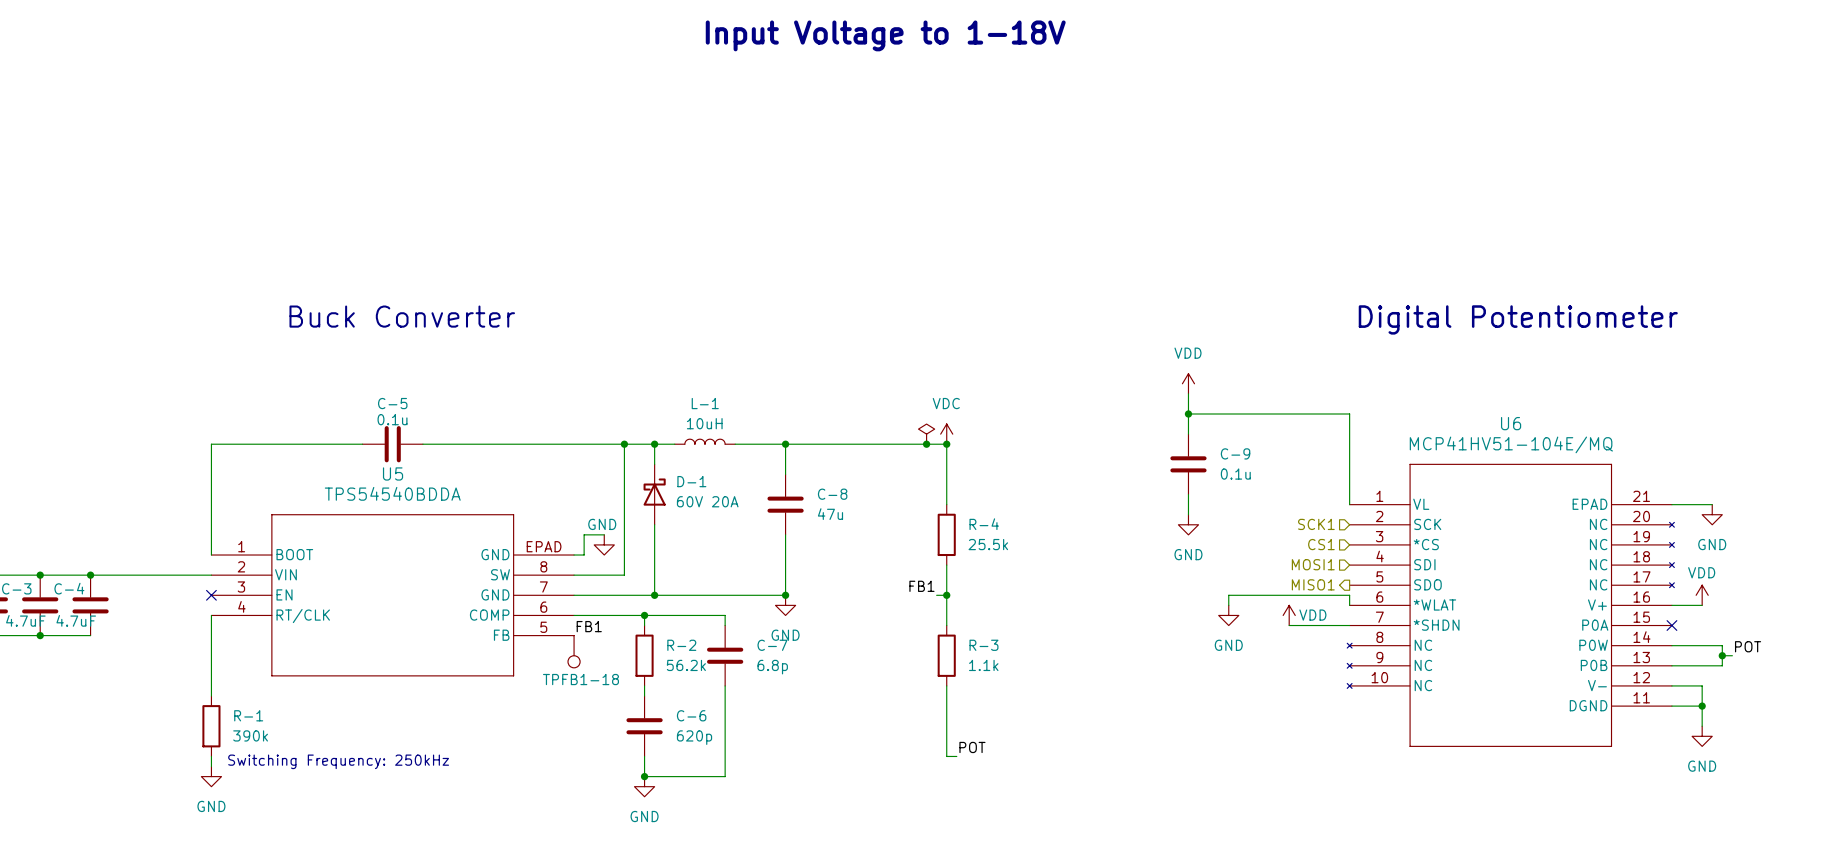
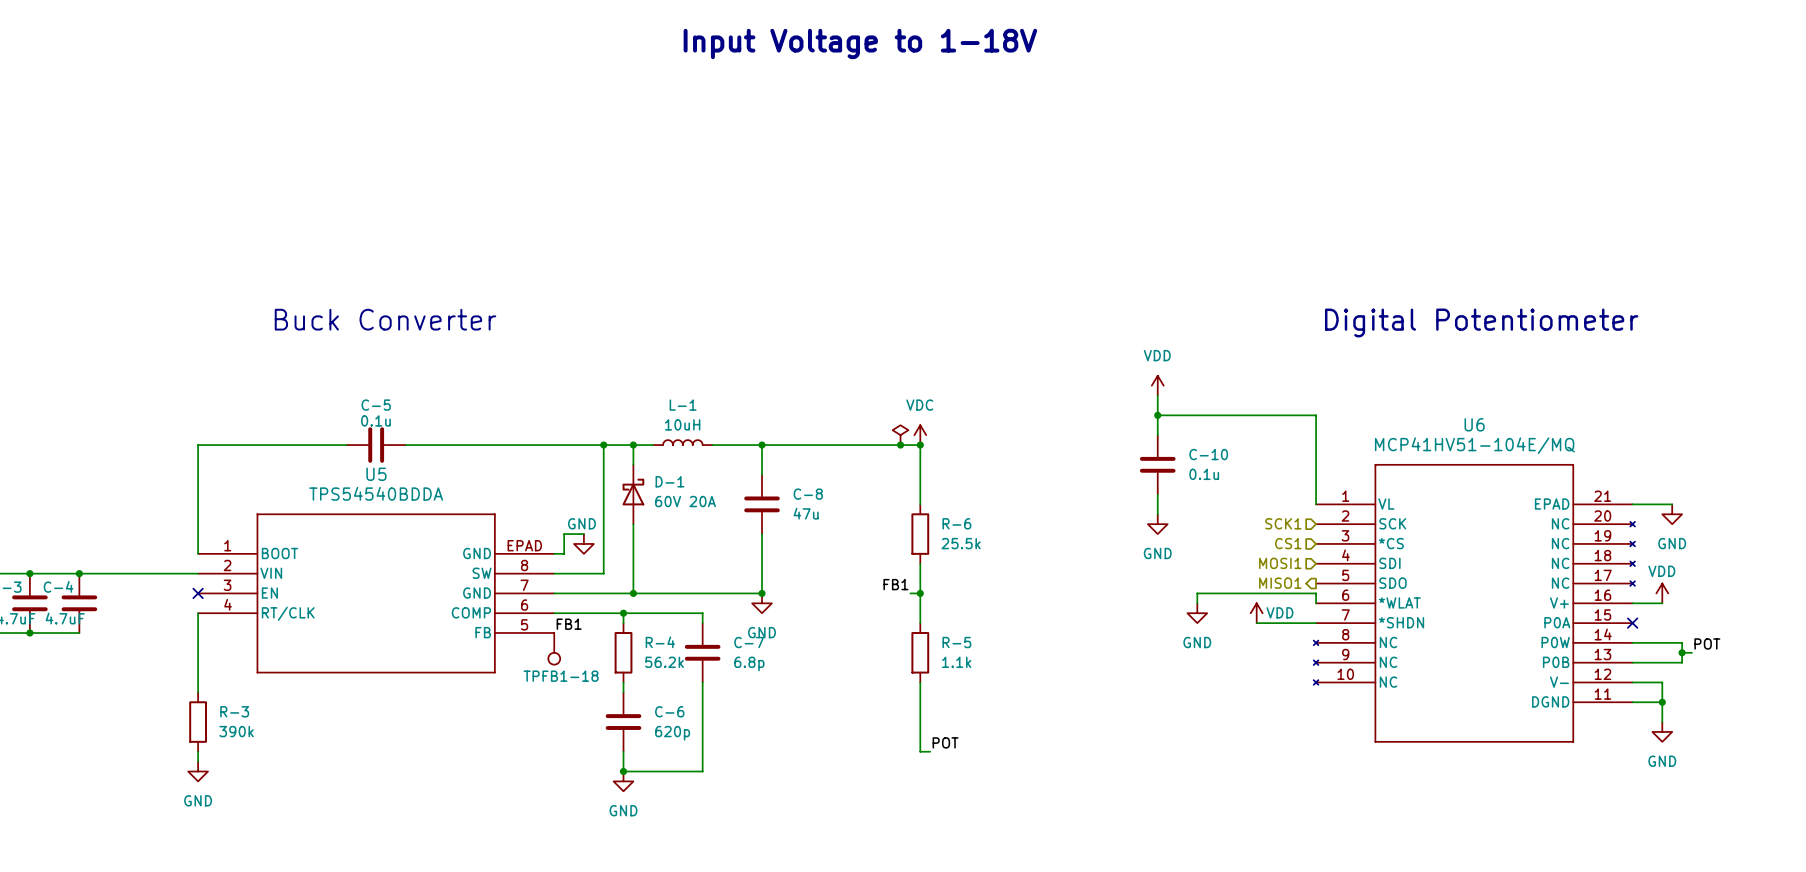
C-9 name: C-9 (1235, 453) -> C-10 (1208, 454)
R-4 name: R-4 (984, 524) -> R-6 (956, 523)
R-2 name: R-2 (681, 645) -> R-4 (660, 642)
R-3 name: R-3 (983, 645) -> R-5 (956, 642)
R-1 name: R-1 (248, 715) -> R-3 (234, 711)
text: Switching Frequency: 250kHz (338, 761) -> none

